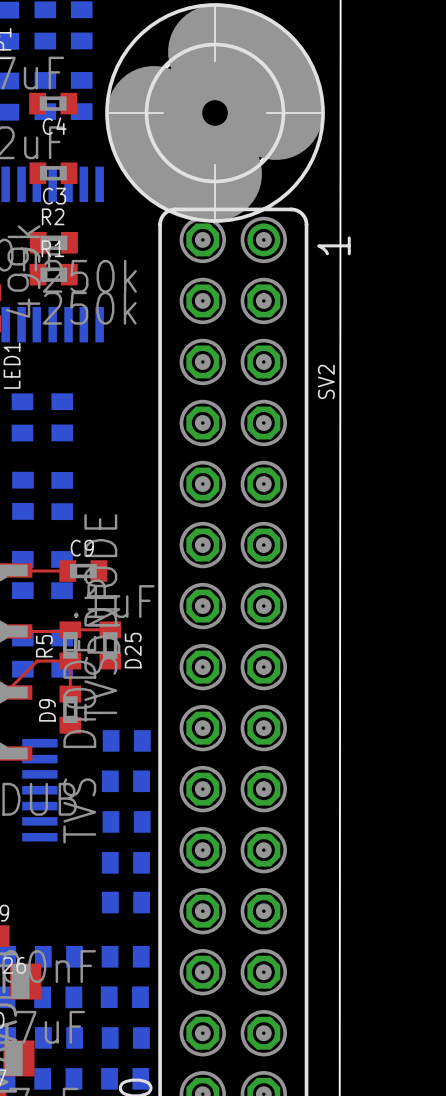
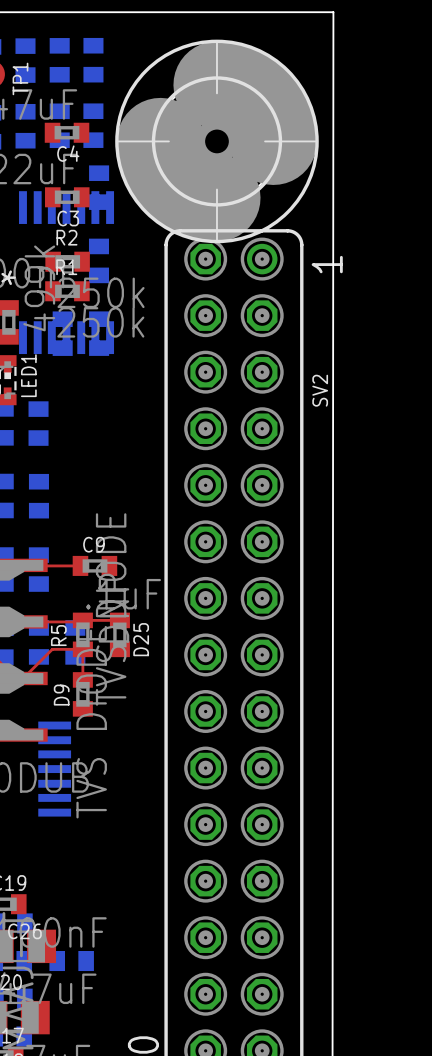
part: none -> (99, 187)
part: none -> (98, 260)
part: none -> (62, 333)
part: none -> (99, 333)
part: (62, 417) -> none
part: (62, 496) -> none
part: (62, 575) -> none
part: (126, 740) -> none
part: (125, 781) -> none
part: (126, 821) -> none
part: (125, 862) -> none
part: (126, 902) -> none
part: (58, 956) -> none
part: (125, 956) -> none
part: (124, 997) -> none
part: (59, 1037) -> none
part: (125, 1037) -> none
part: (58, 1078) -> none
part: (125, 1078) -> none

